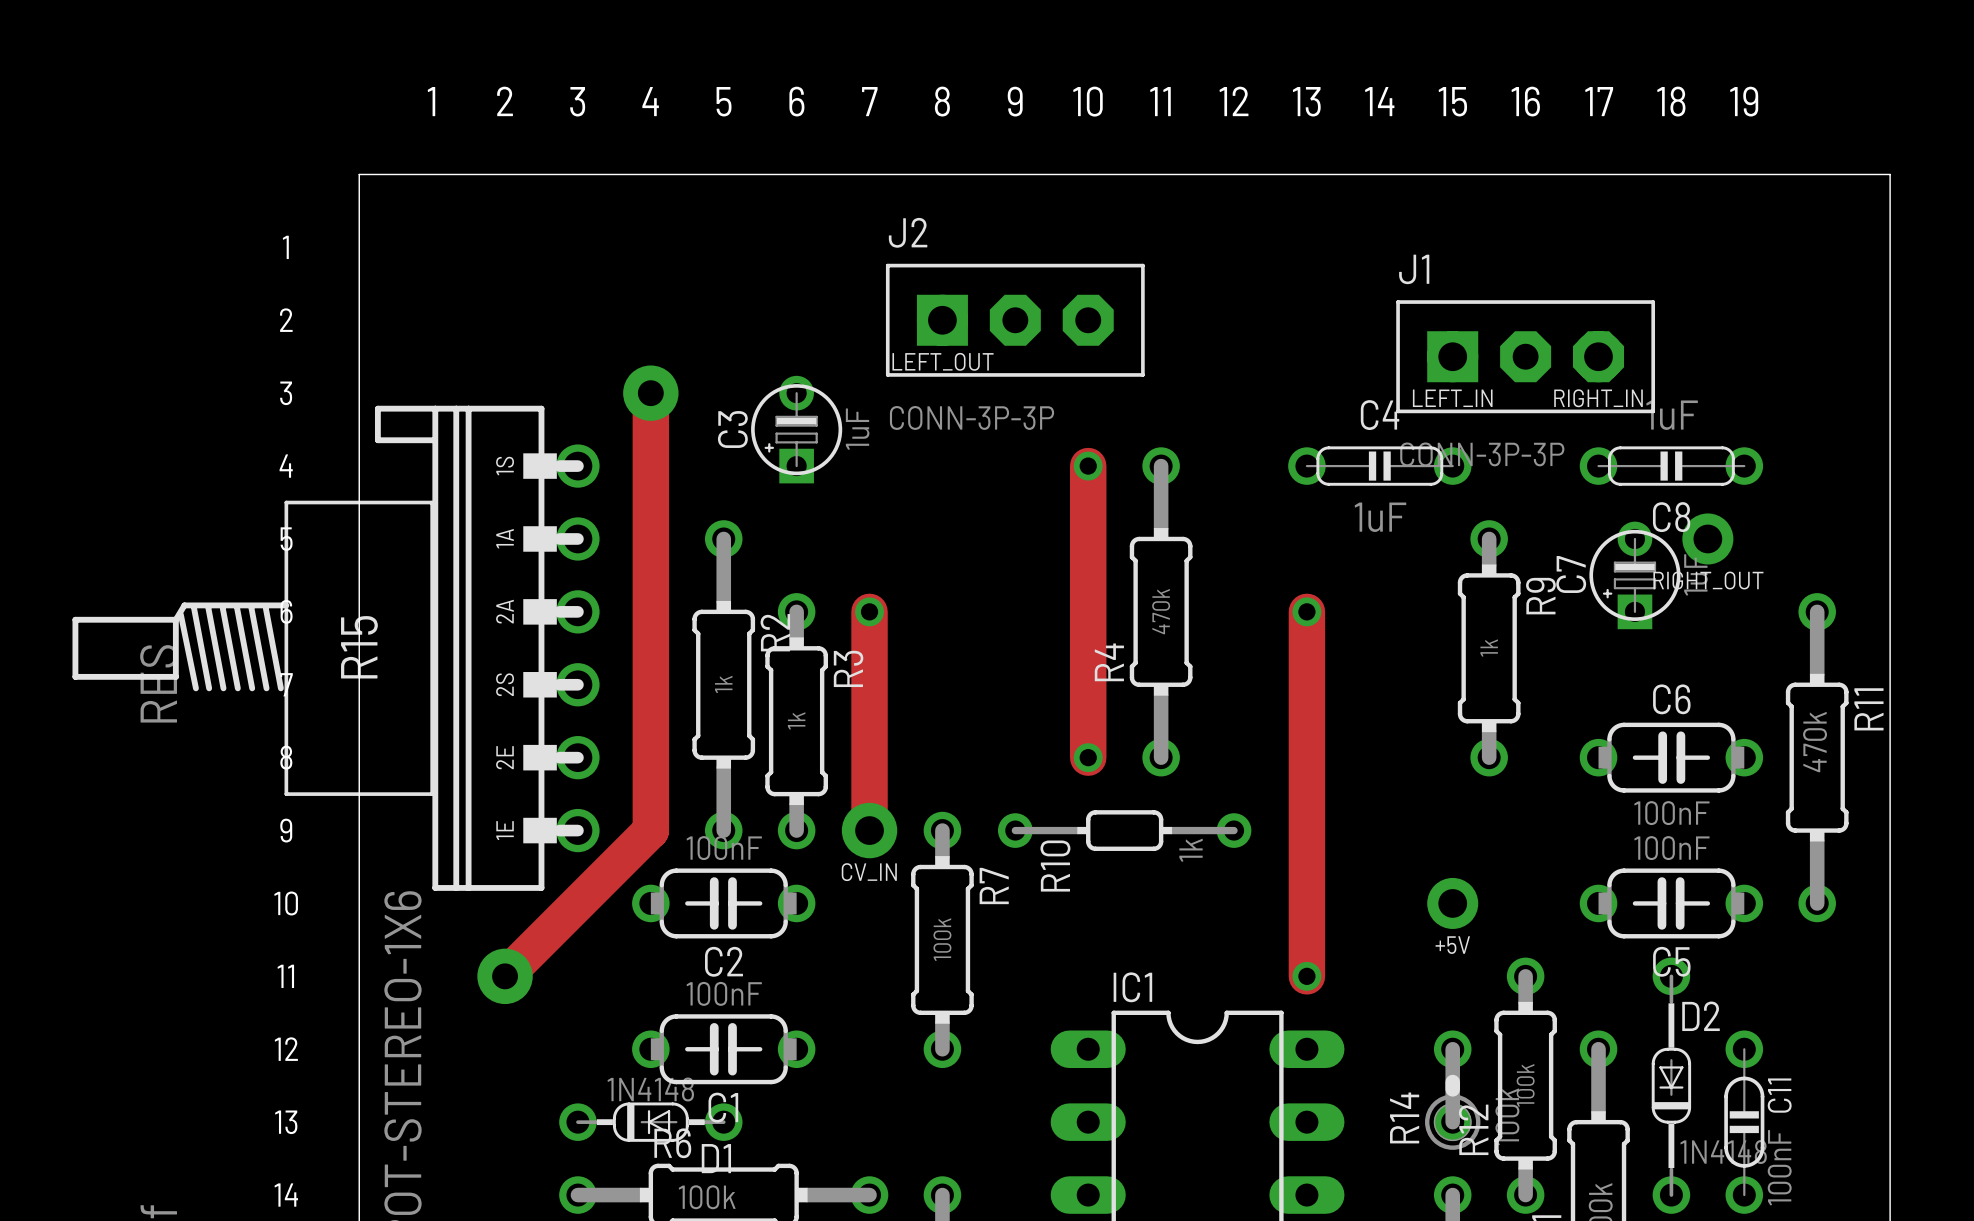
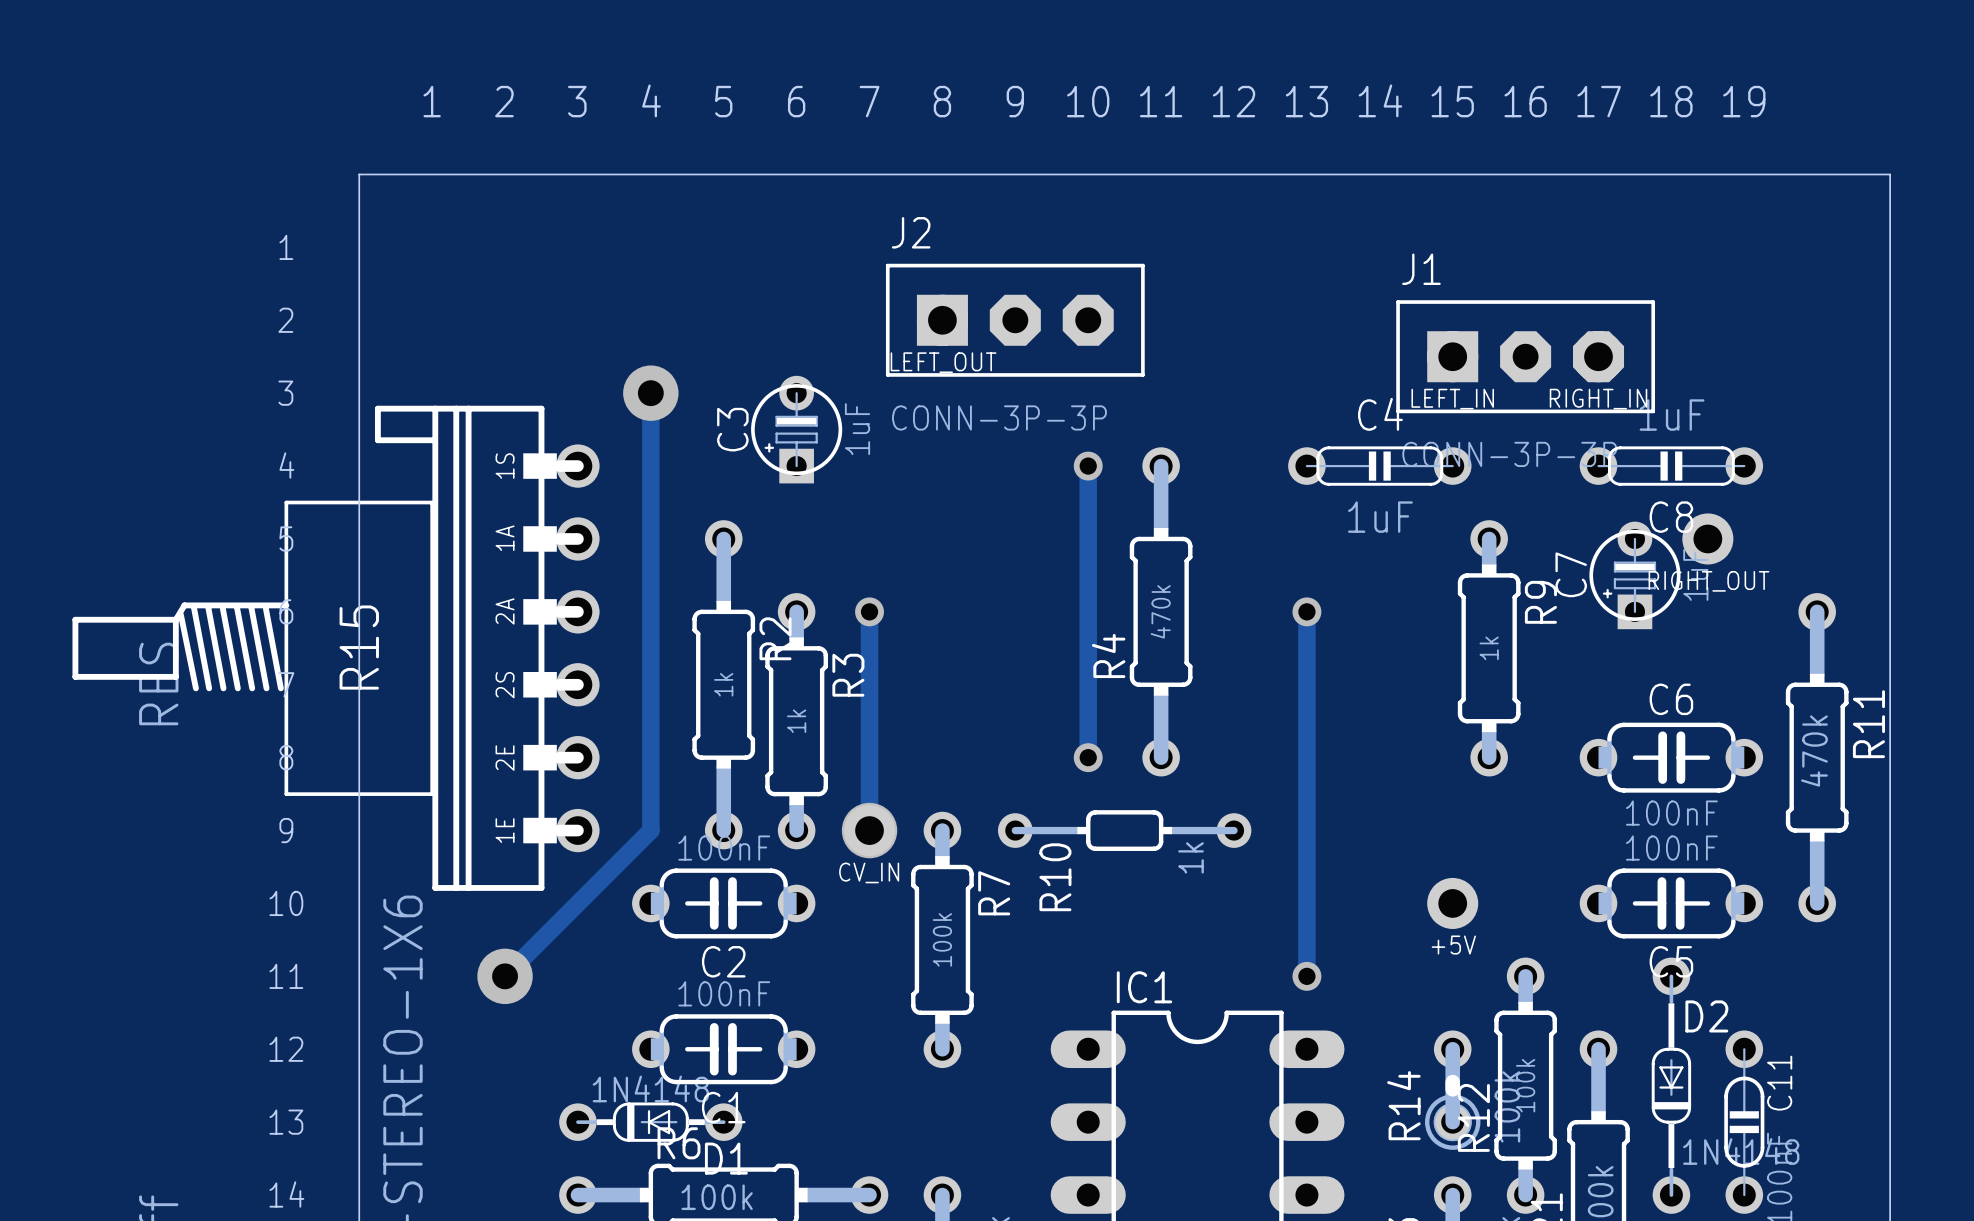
track width: thick (650, 393) (650, 830) (505, 976) -> thin (650, 393) (650, 830) (505, 976)
track width: thick (1088, 466) (1088, 757) -> thin (1088, 466) (1088, 757)
track width: thick (869, 611) (869, 830) -> thin (869, 611) (869, 830)
track width: thick (1306, 611) (1306, 976) -> thin (1306, 611) (1306, 976)

